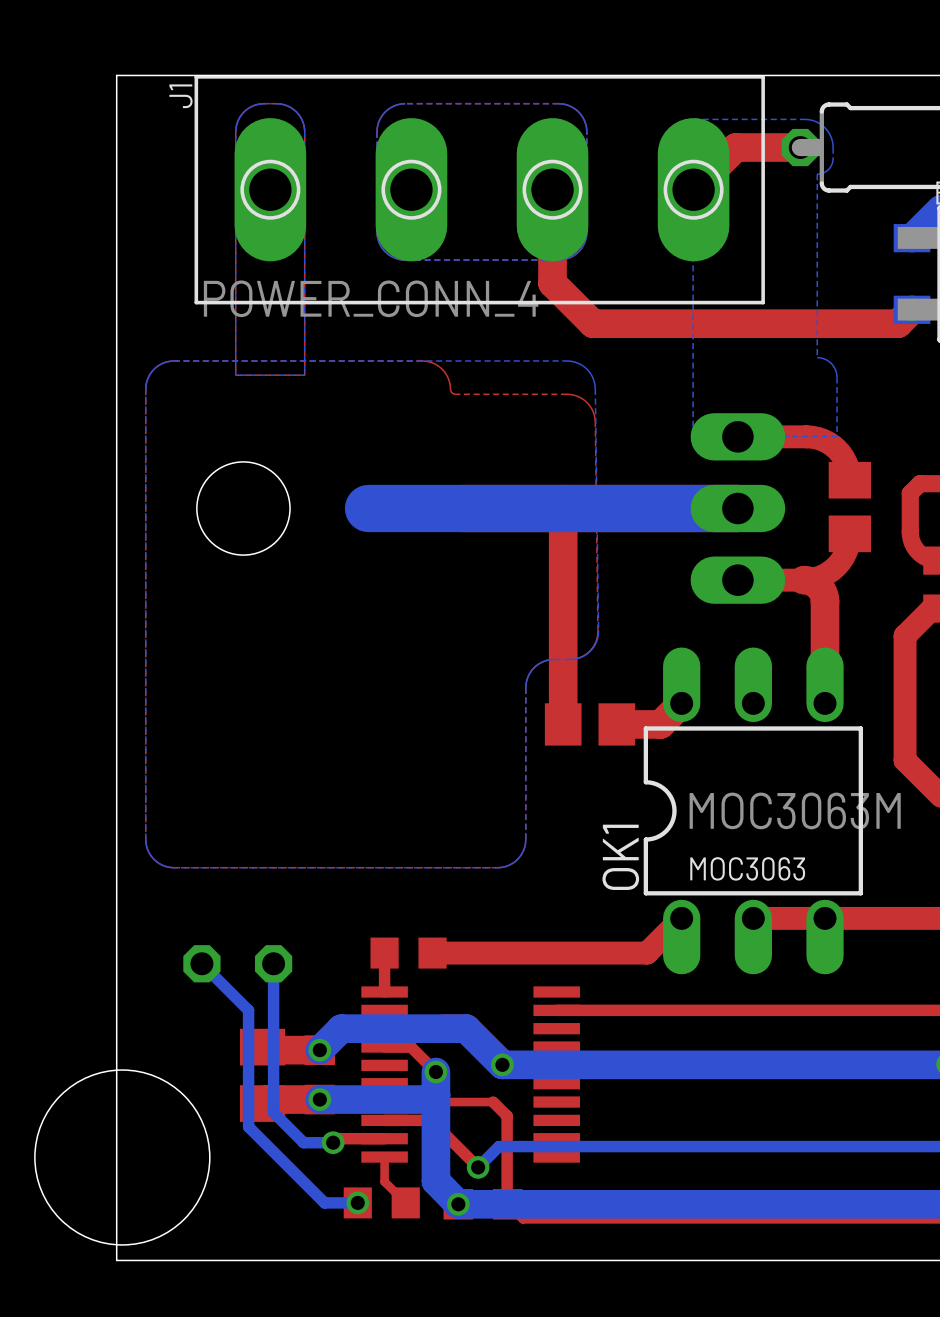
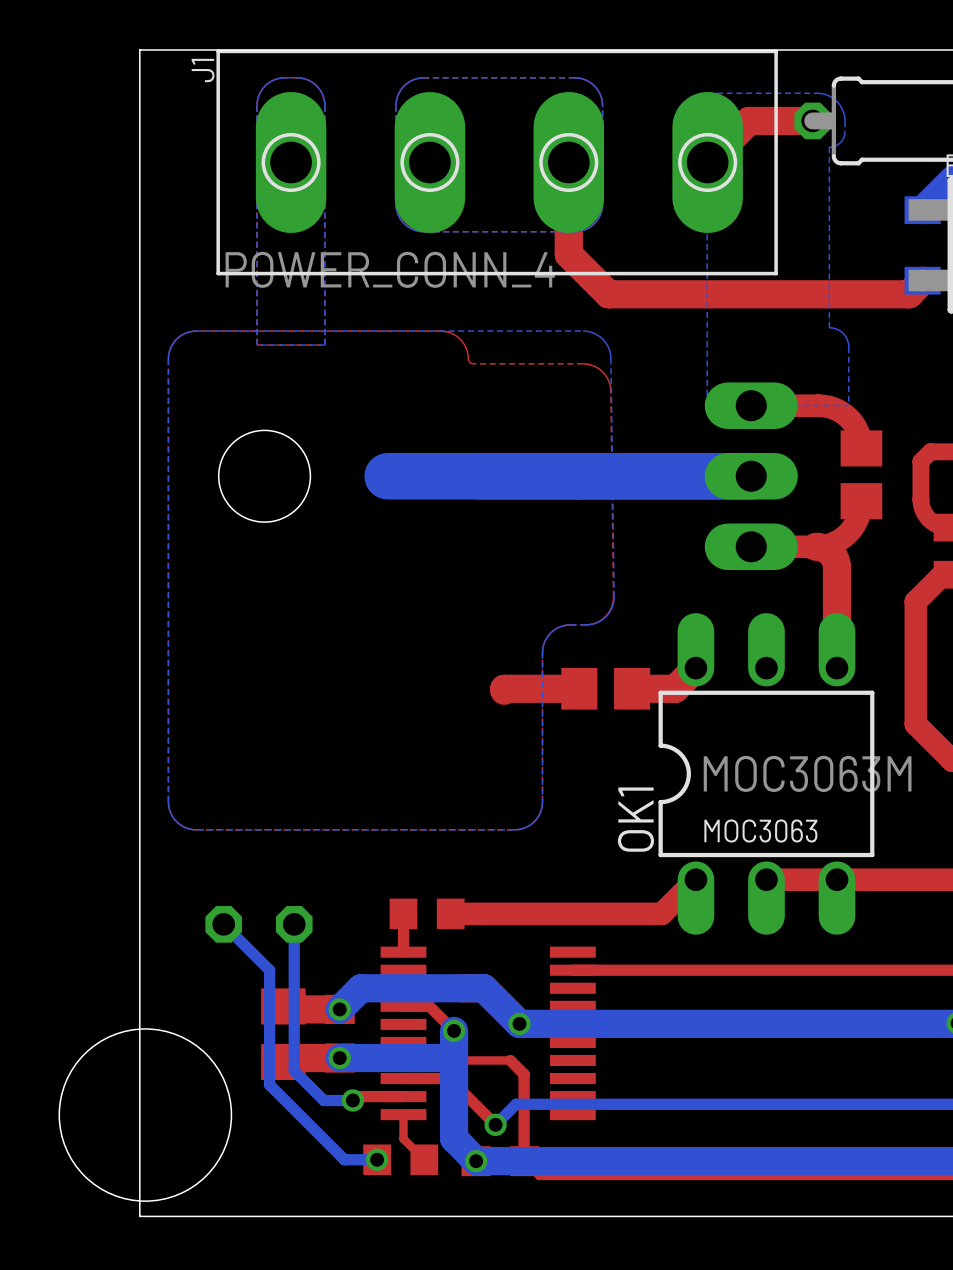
top track: (563, 509) (563, 724) -> (504, 690) (504, 688) (579, 688)

